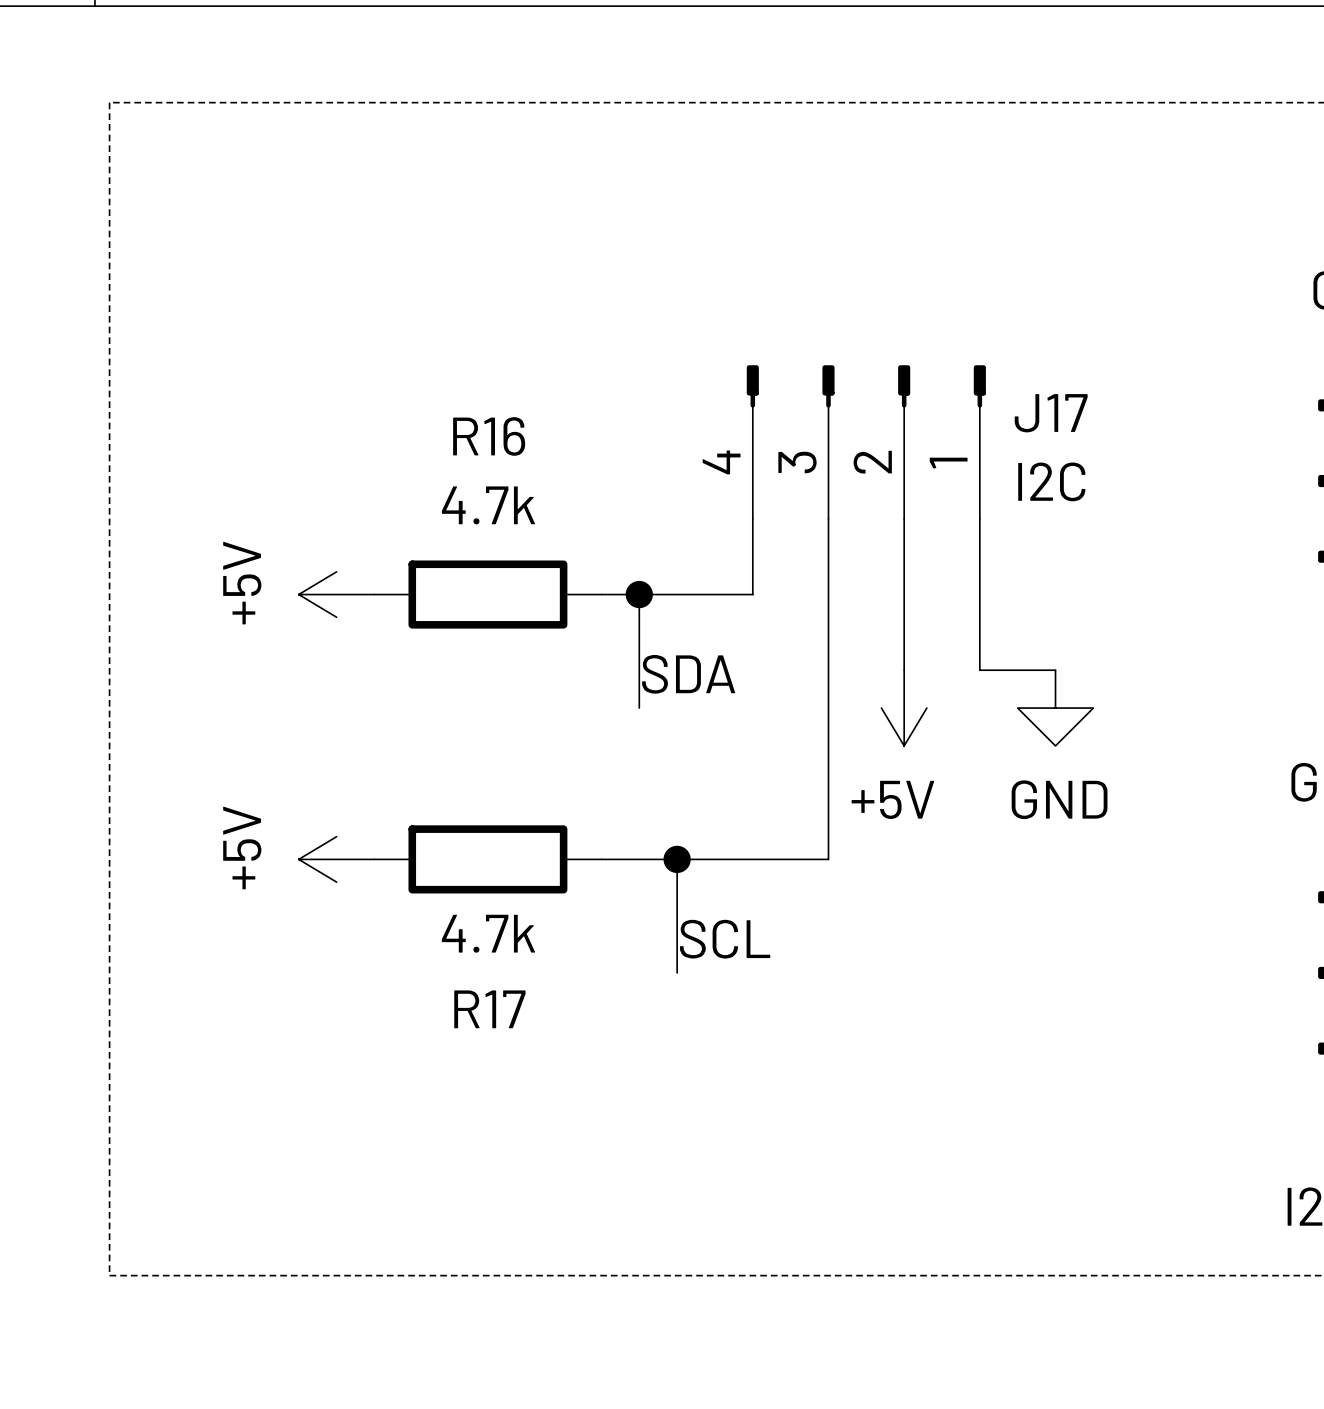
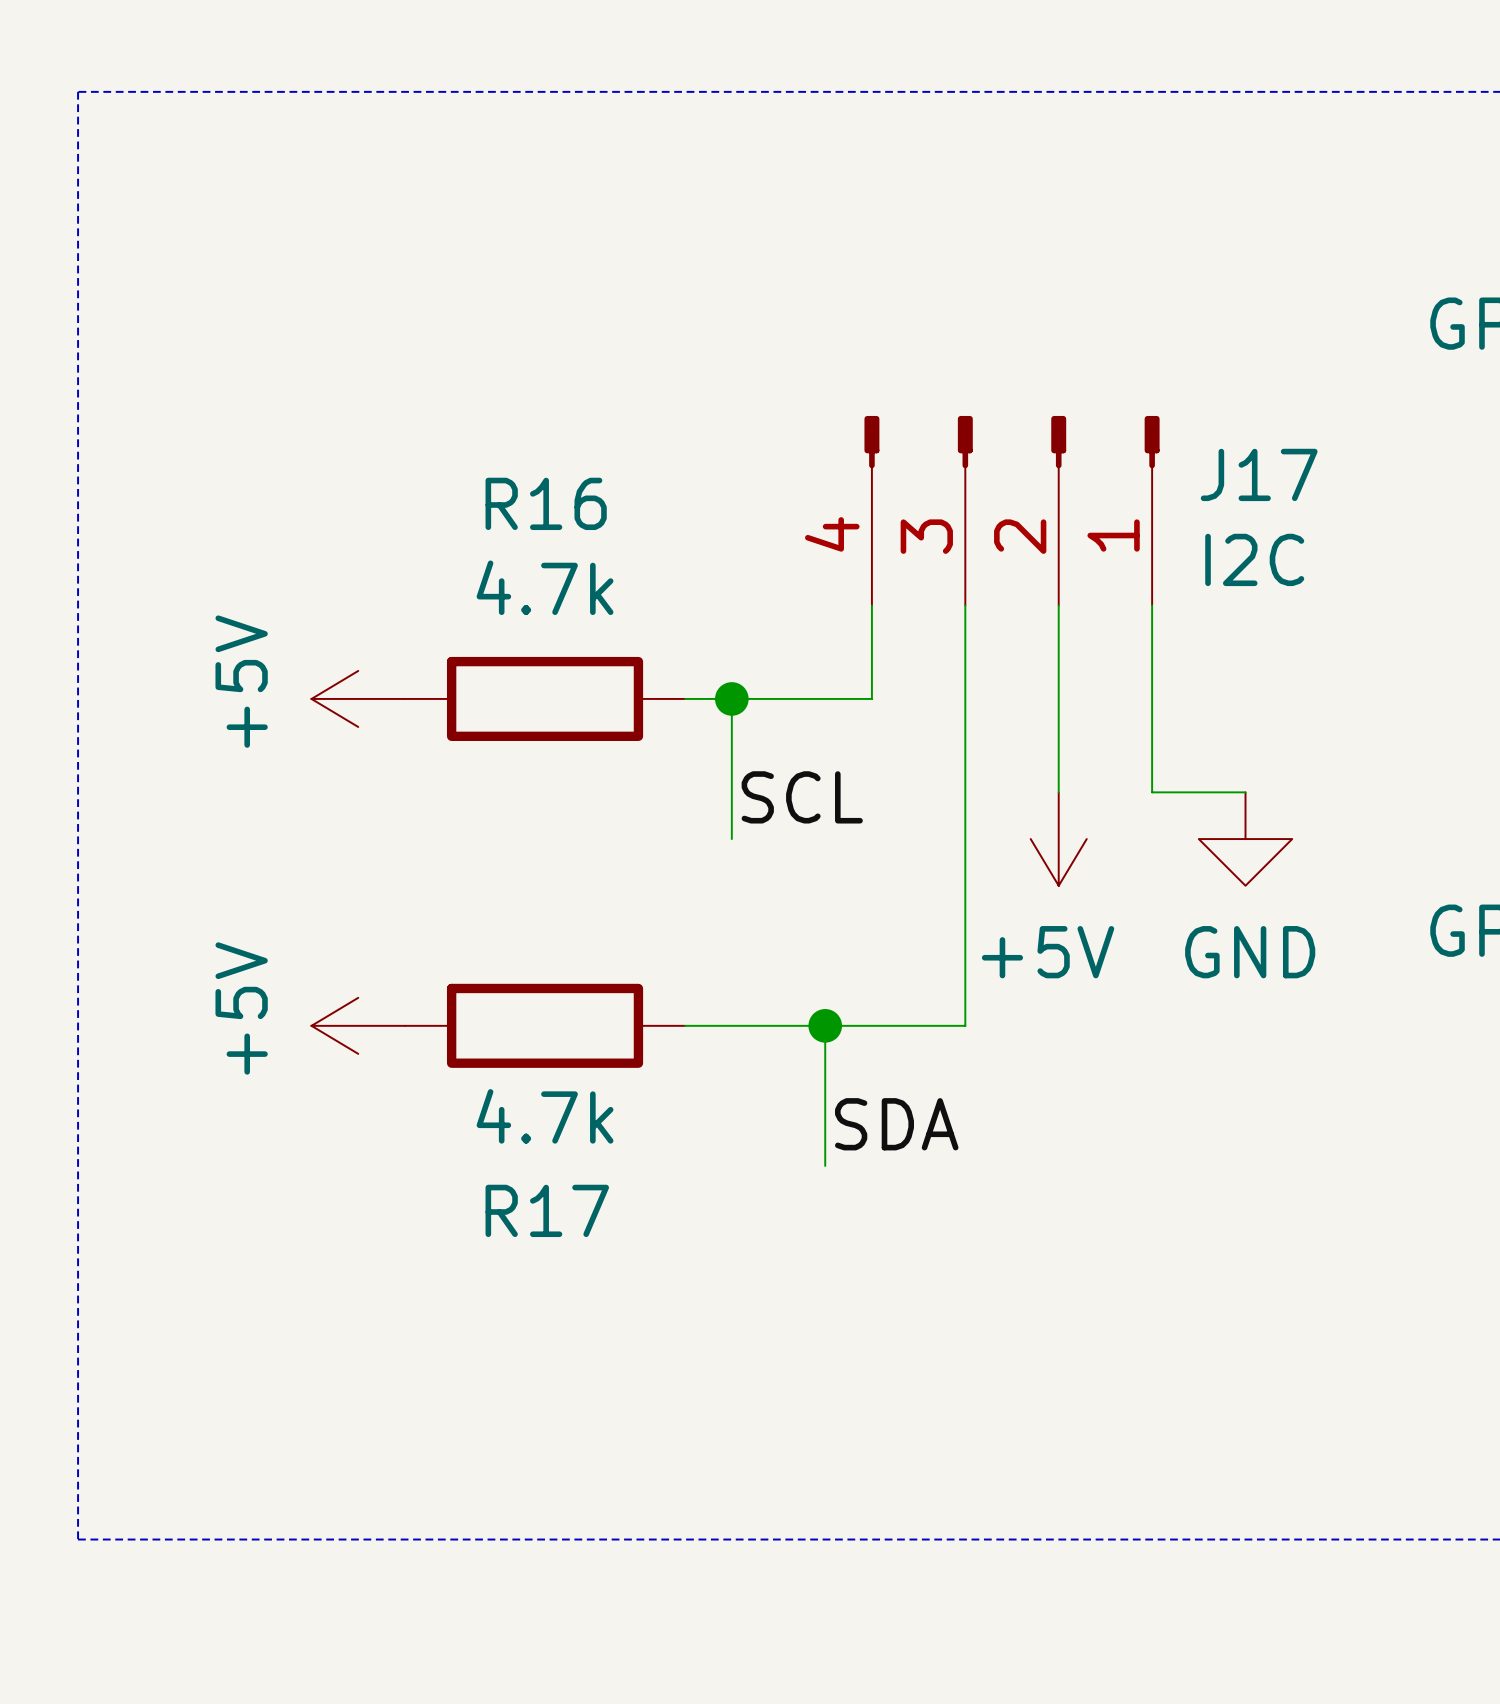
label: SDA (688, 674) -> SCL (802, 797)
wire: (677, 859) (677, 972) -> (825, 1025) (825, 1165)
junction position: (677, 859) -> (825, 1025)
label: SCL (725, 939) -> none
label: none -> SDA (896, 1124)

